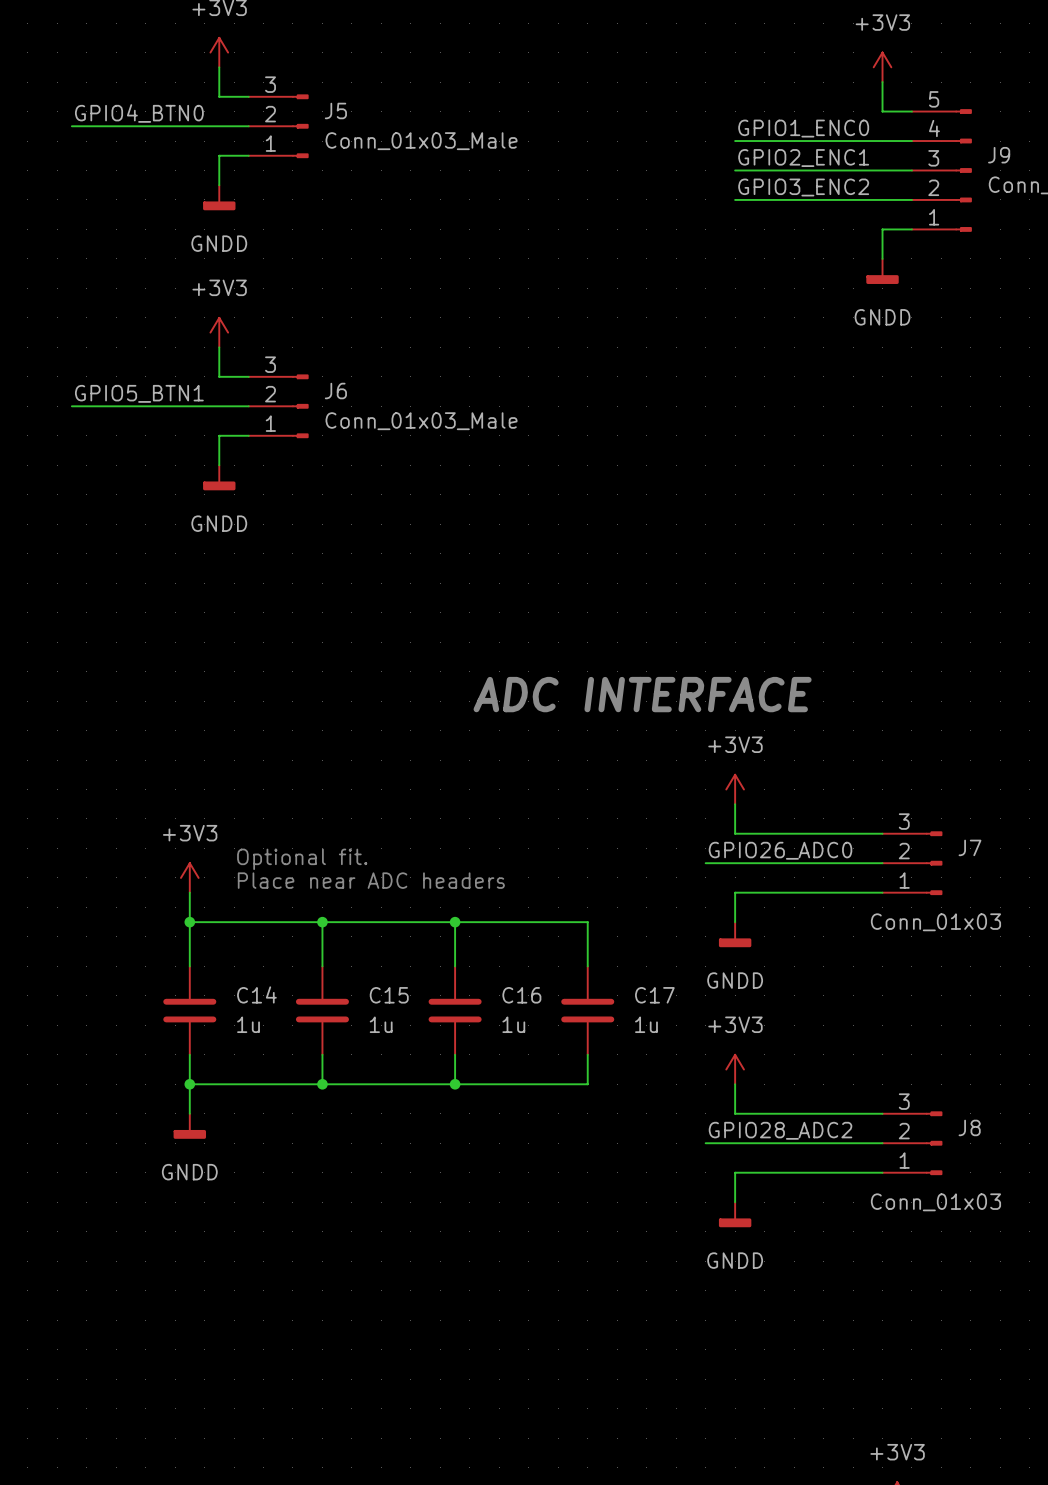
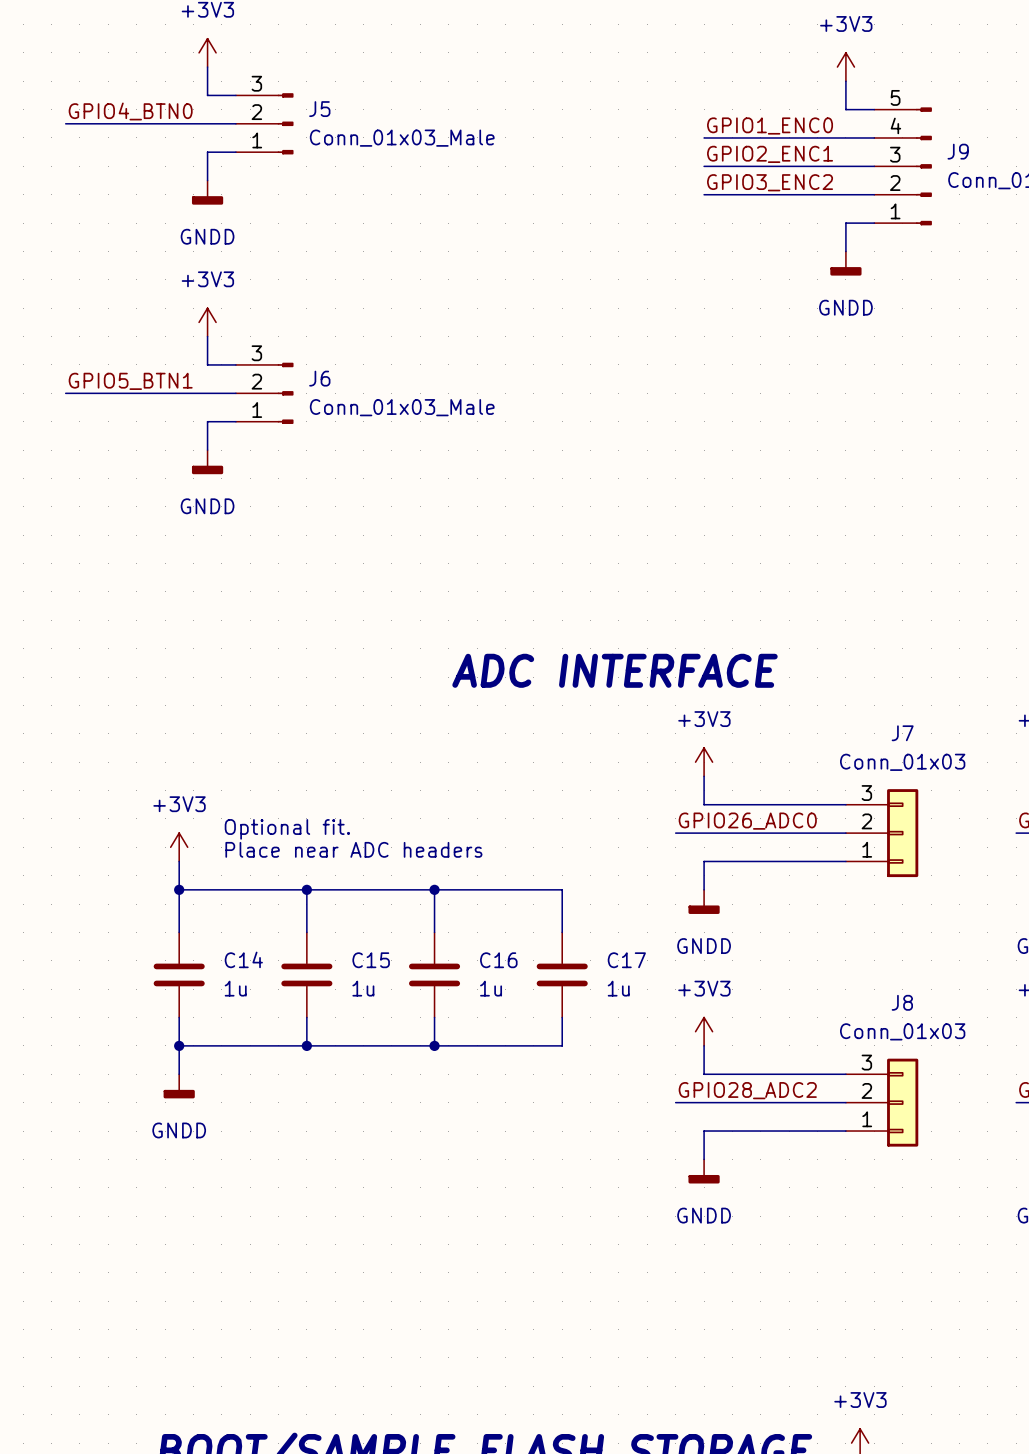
J7 symbol: [882, 831, 943, 896] -> [845, 789, 919, 878]
J7 name position: J7 (970, 847) -> J7 (902, 733)
J7 value position: Conn_01x03 (935, 922) -> Conn_01x03 (902, 762)
J8 symbol: [882, 1111, 943, 1176] -> [845, 1058, 919, 1147]
J8 name position: J8 (969, 1127) -> J8 (902, 1002)
J8 value position: Conn_01x03 (935, 1202) -> Conn_01x03 (902, 1031)

